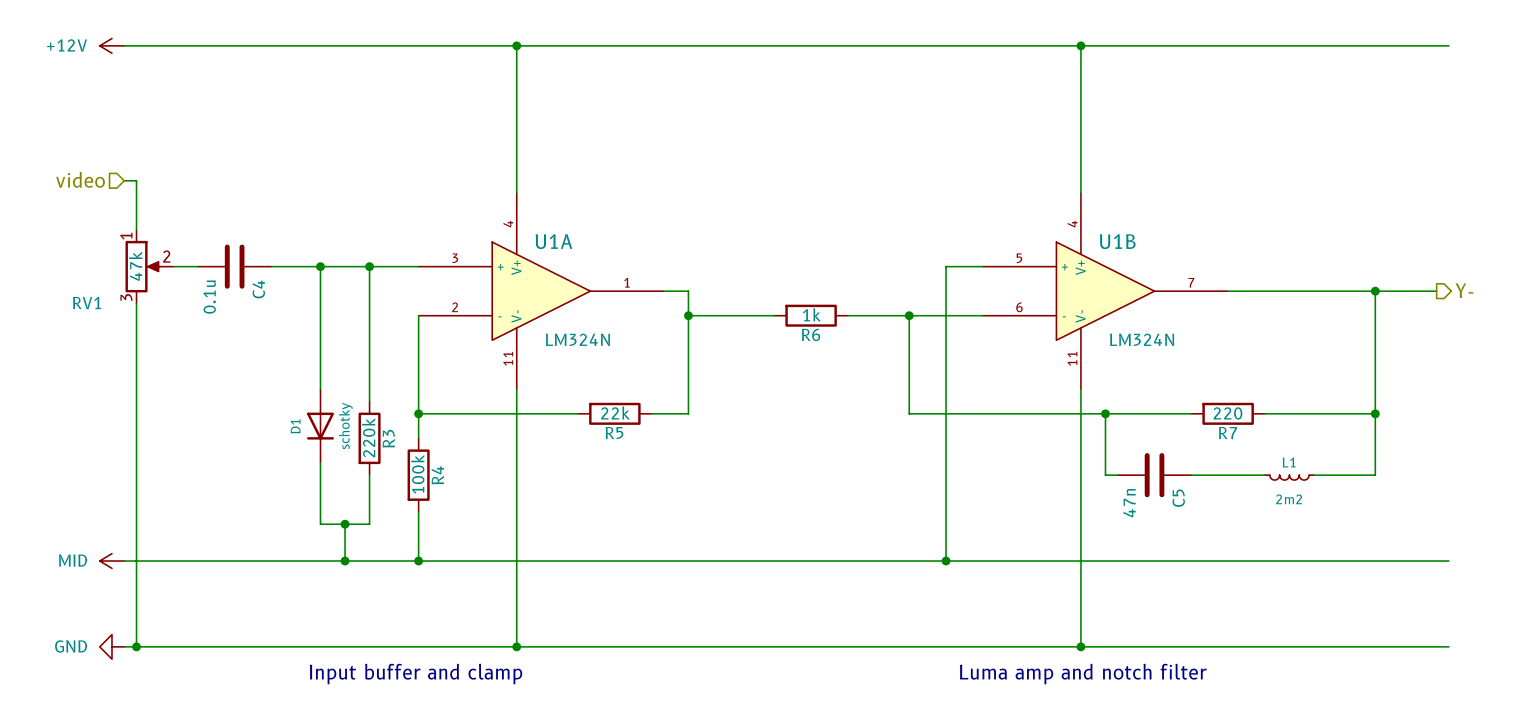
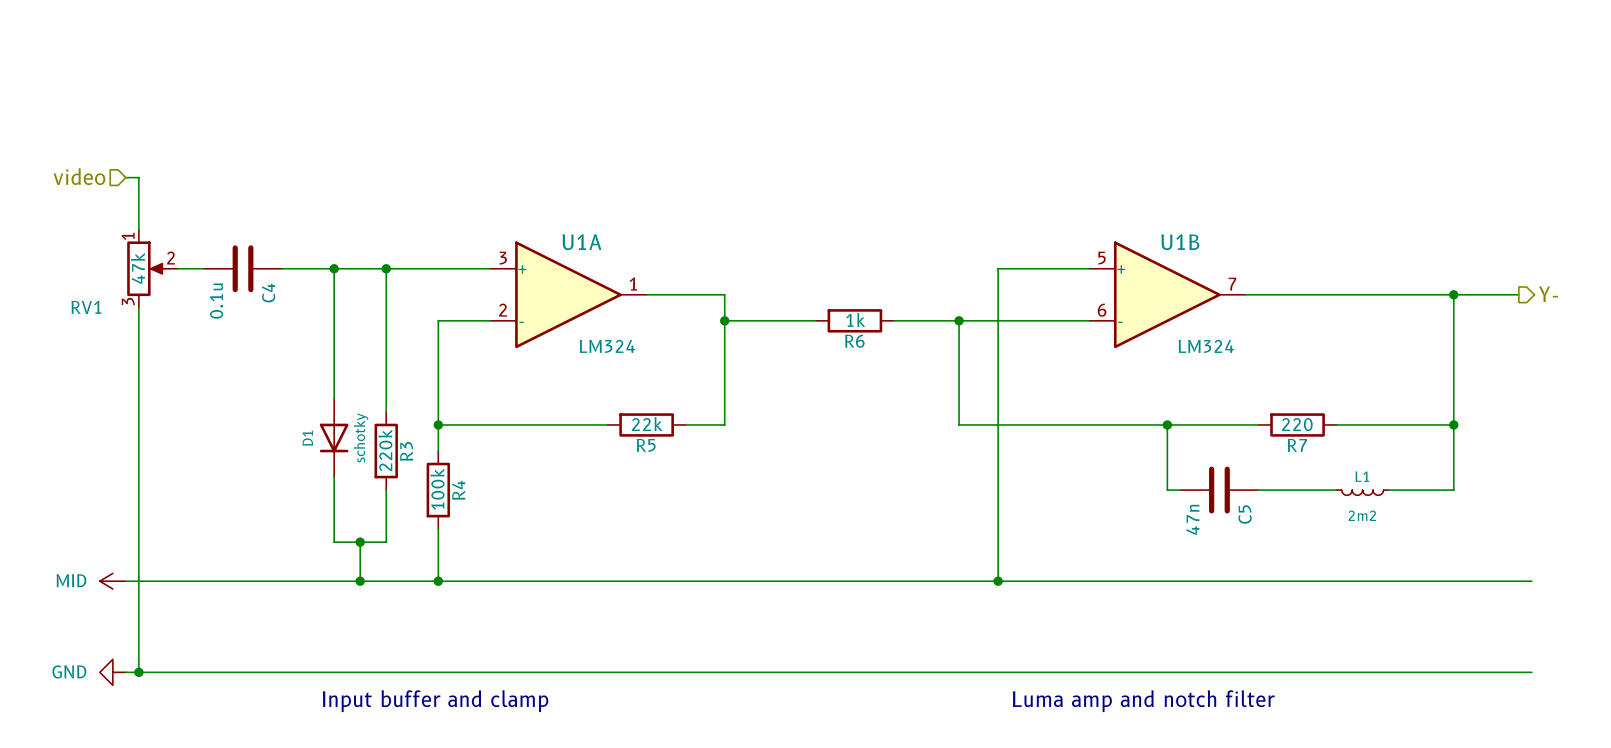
power symbol: +12V (111, 45) -> none
wire: (124, 45) (1448, 45) -> none
wire: (516, 45) (516, 193) -> none
junction: (516, 45) -> none
wire: (1080, 45) (1080, 193) -> none
junction: (1080, 45) -> none
U1A symbol: [418, 193, 664, 390] -> [490, 241, 647, 349]
U1B symbol: [982, 193, 1229, 390] -> [1089, 241, 1246, 349]
U1A value: LM324N (577, 339) -> LM324 (607, 346)
U1B value: LM324N (1142, 339) -> LM324 (1206, 346)
wire: (516, 389) (516, 646) -> none
wire: (1080, 389) (1080, 646) -> none
junction: (516, 646) -> none
junction: (1080, 646) -> none

